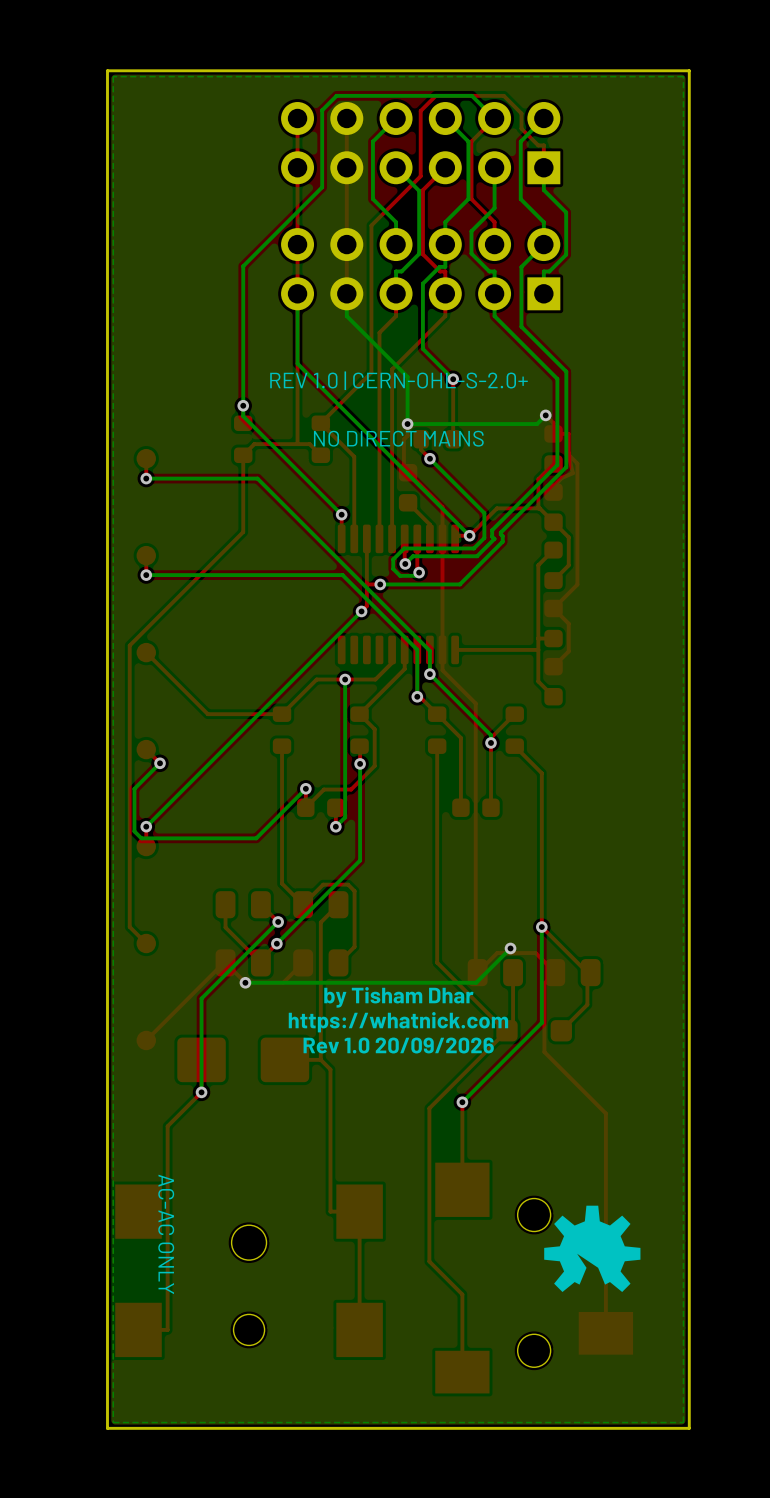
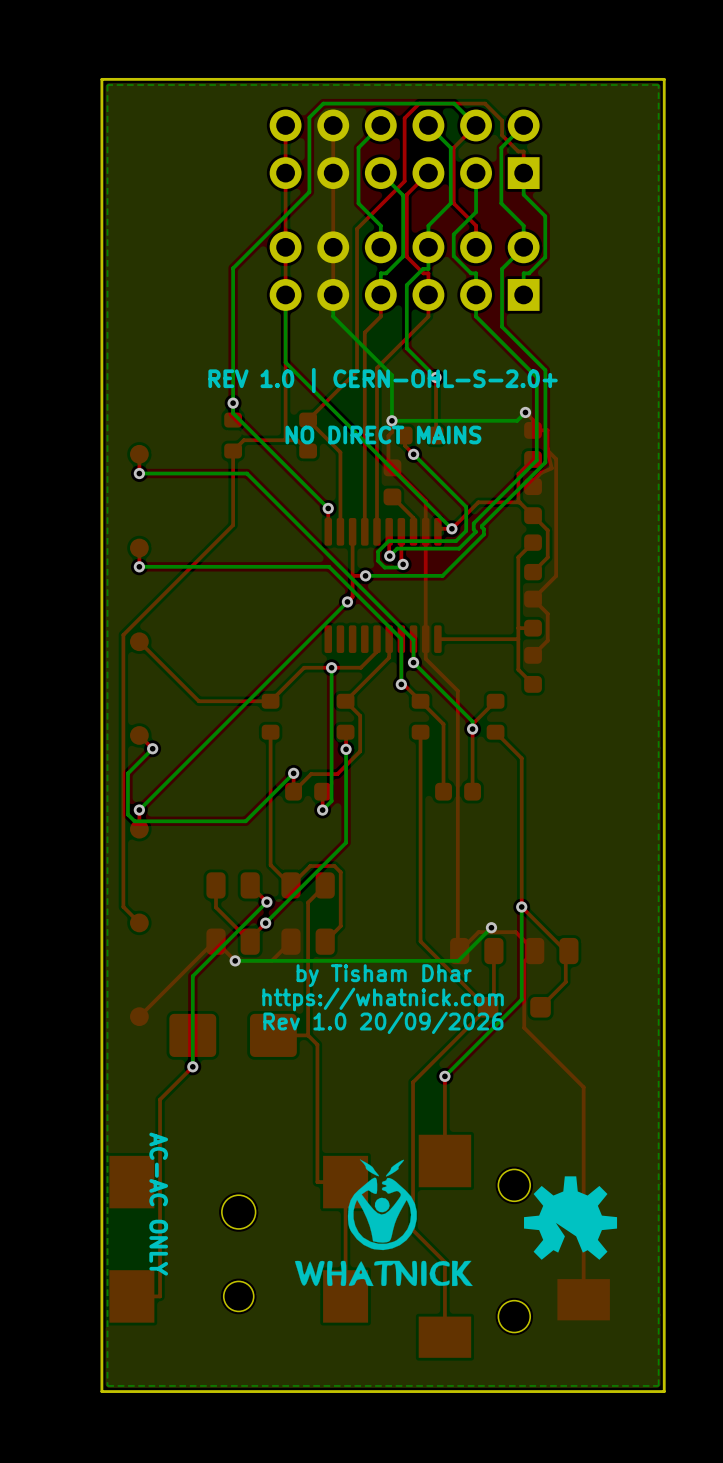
drawing: none -> [294, 1159, 473, 1287]

